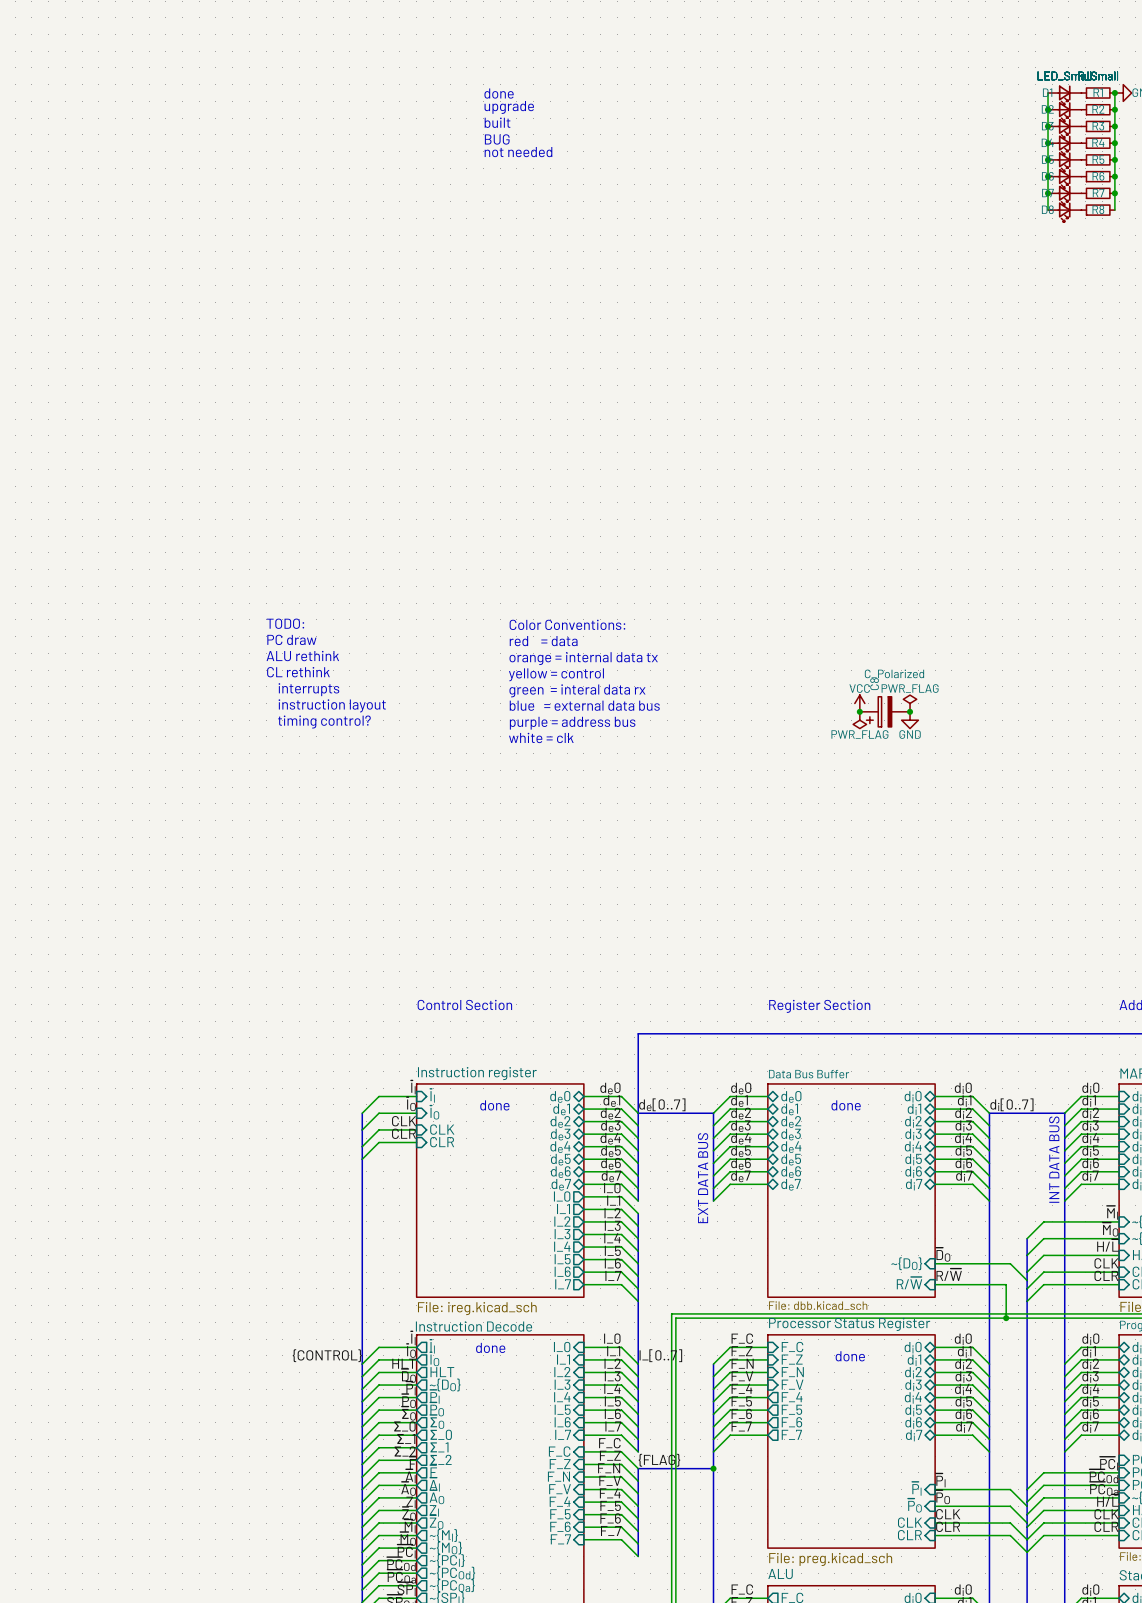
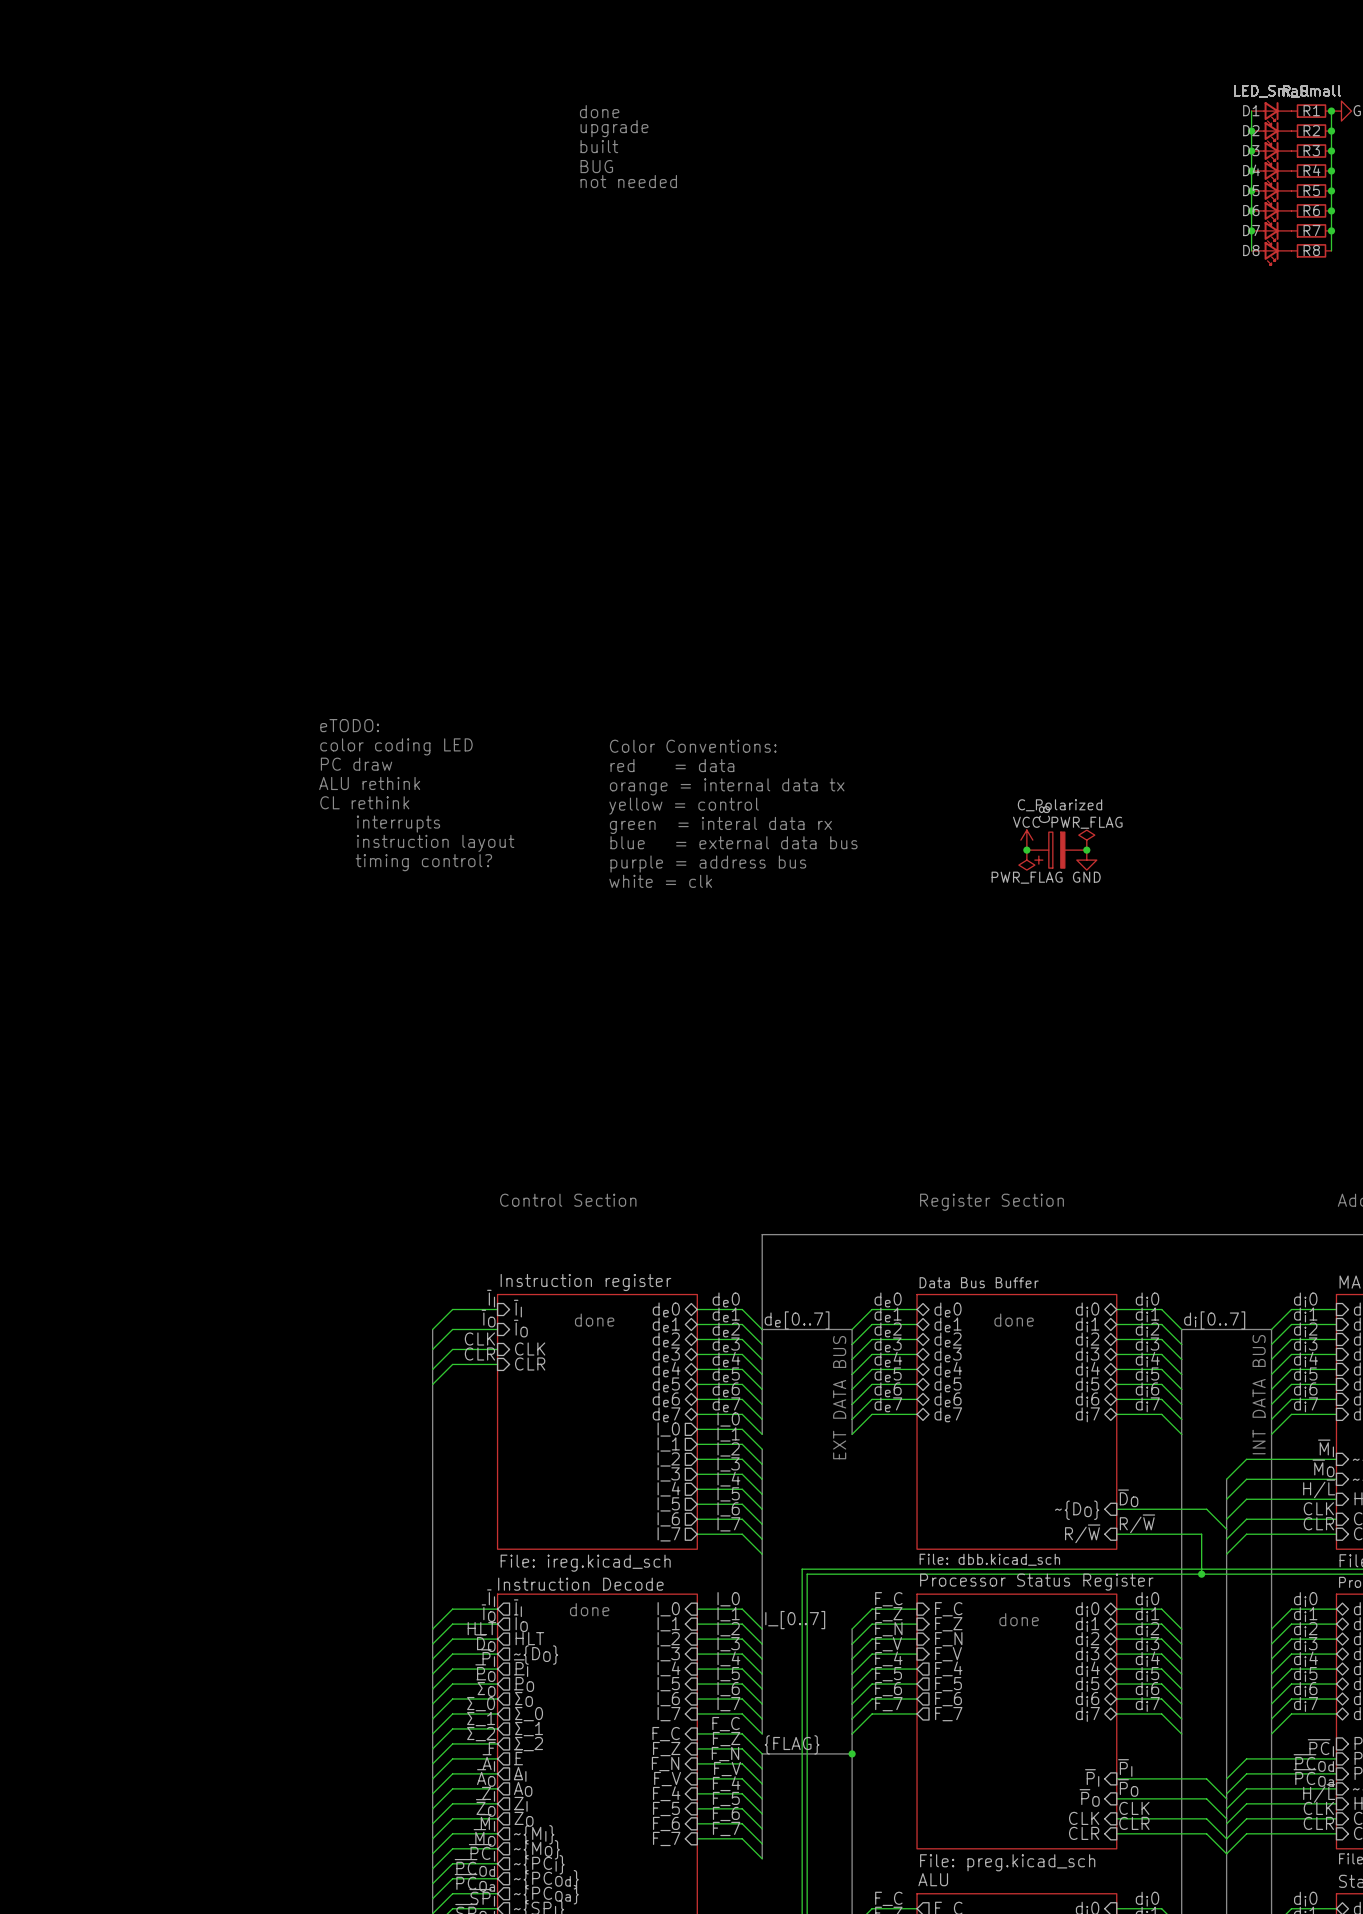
text: none -> eTODO: (349, 725)
text: TODO: (285, 623) -> color coding LED (396, 746)
label: {CONTROL} (327, 1355) -> none

